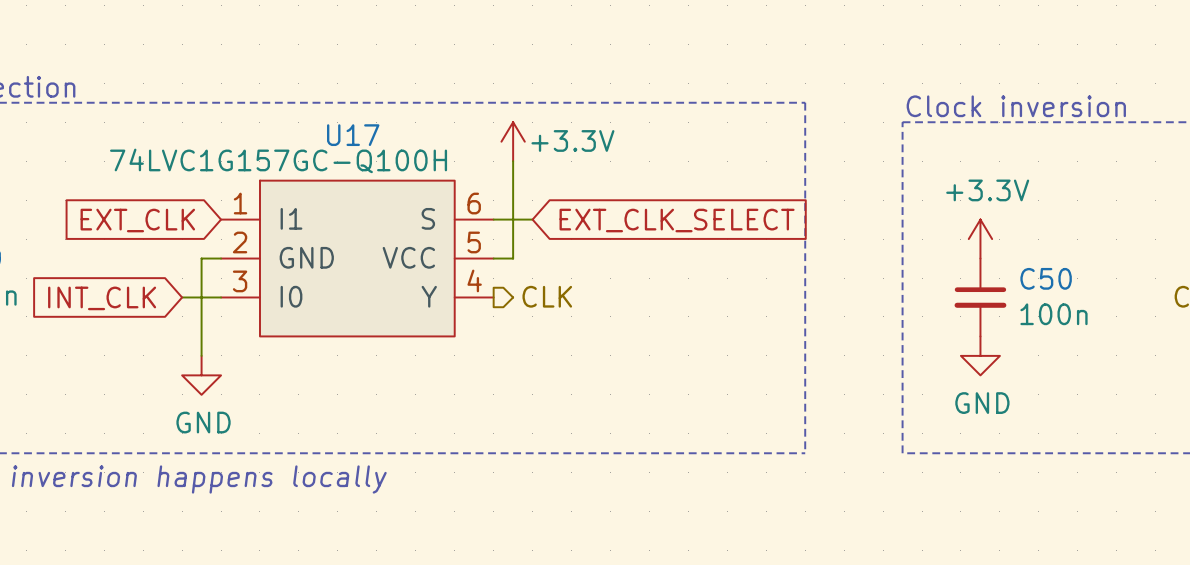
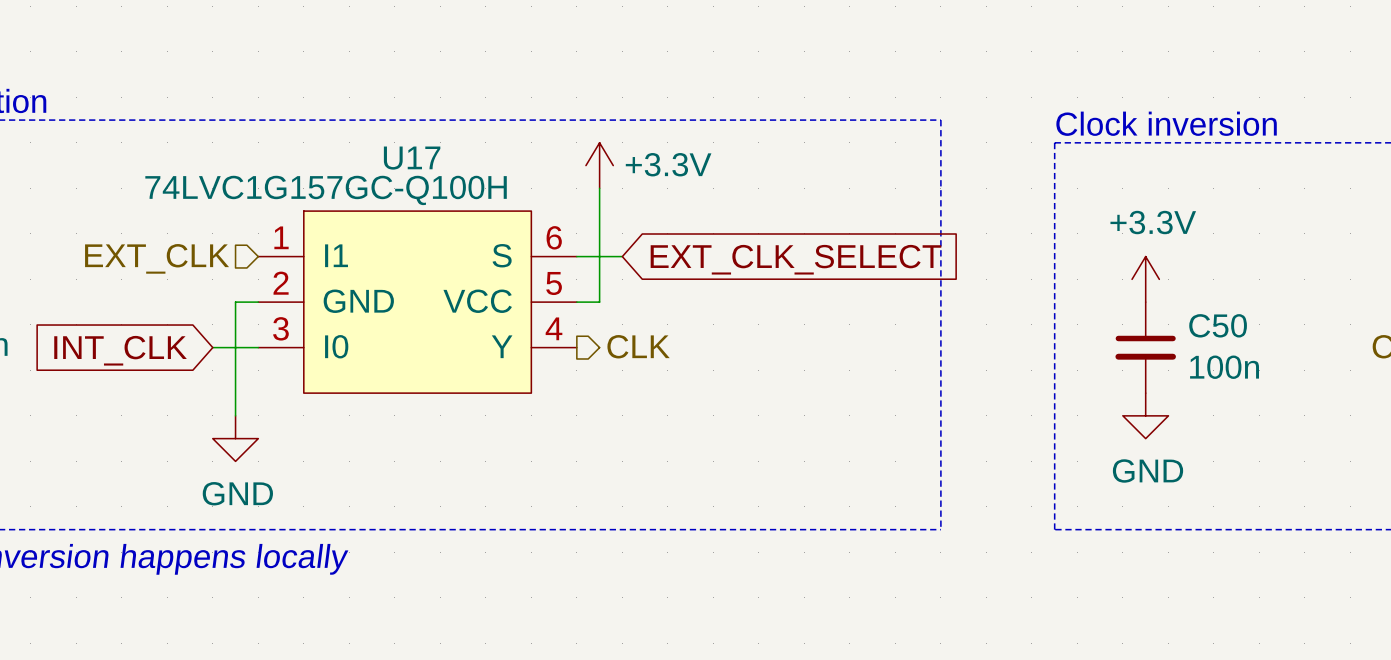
hierarchical label: none -> EXT_CLK (157, 258)
global label: EXT_CLK (137, 220) -> none

